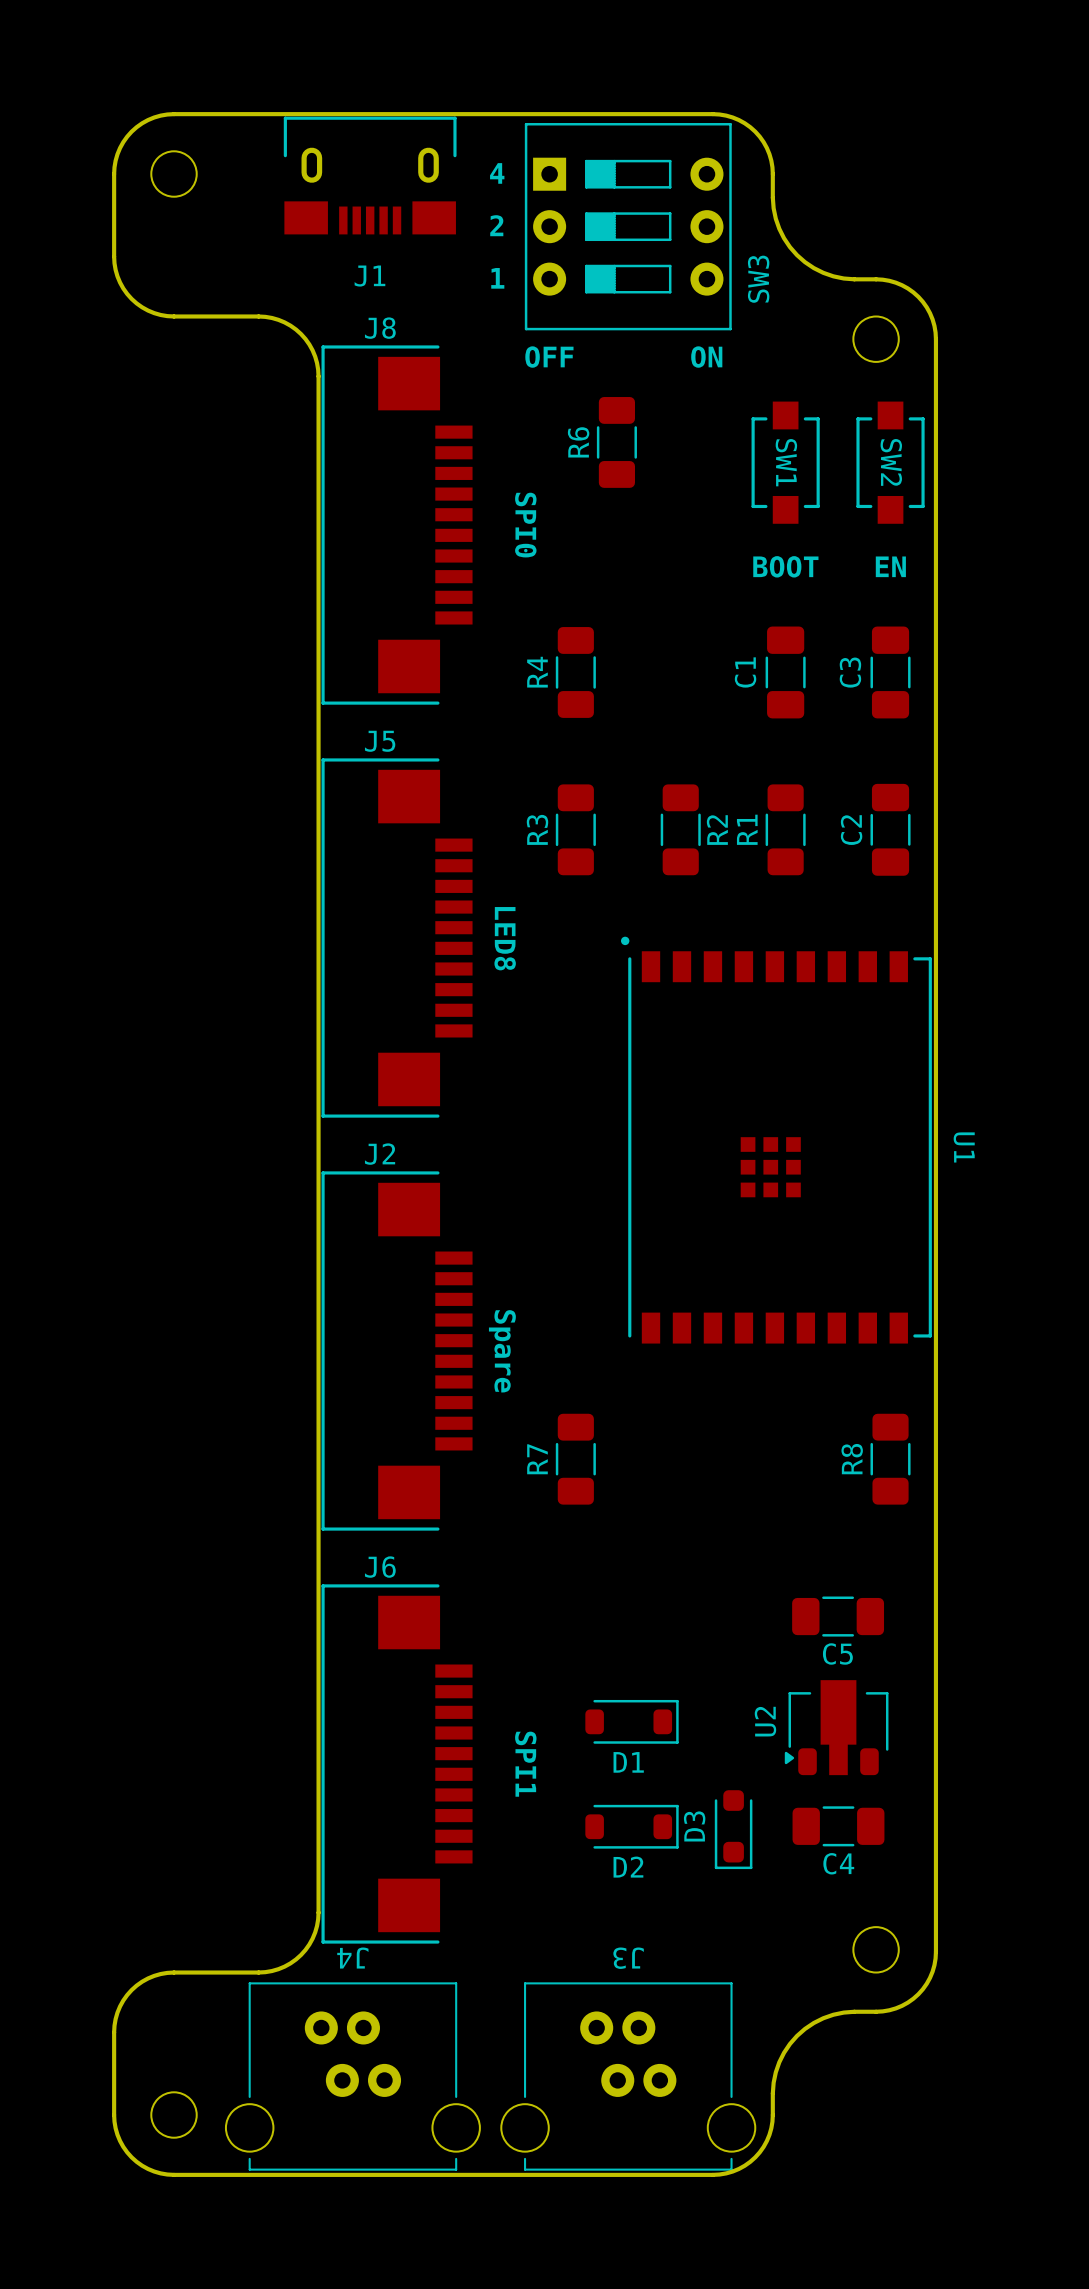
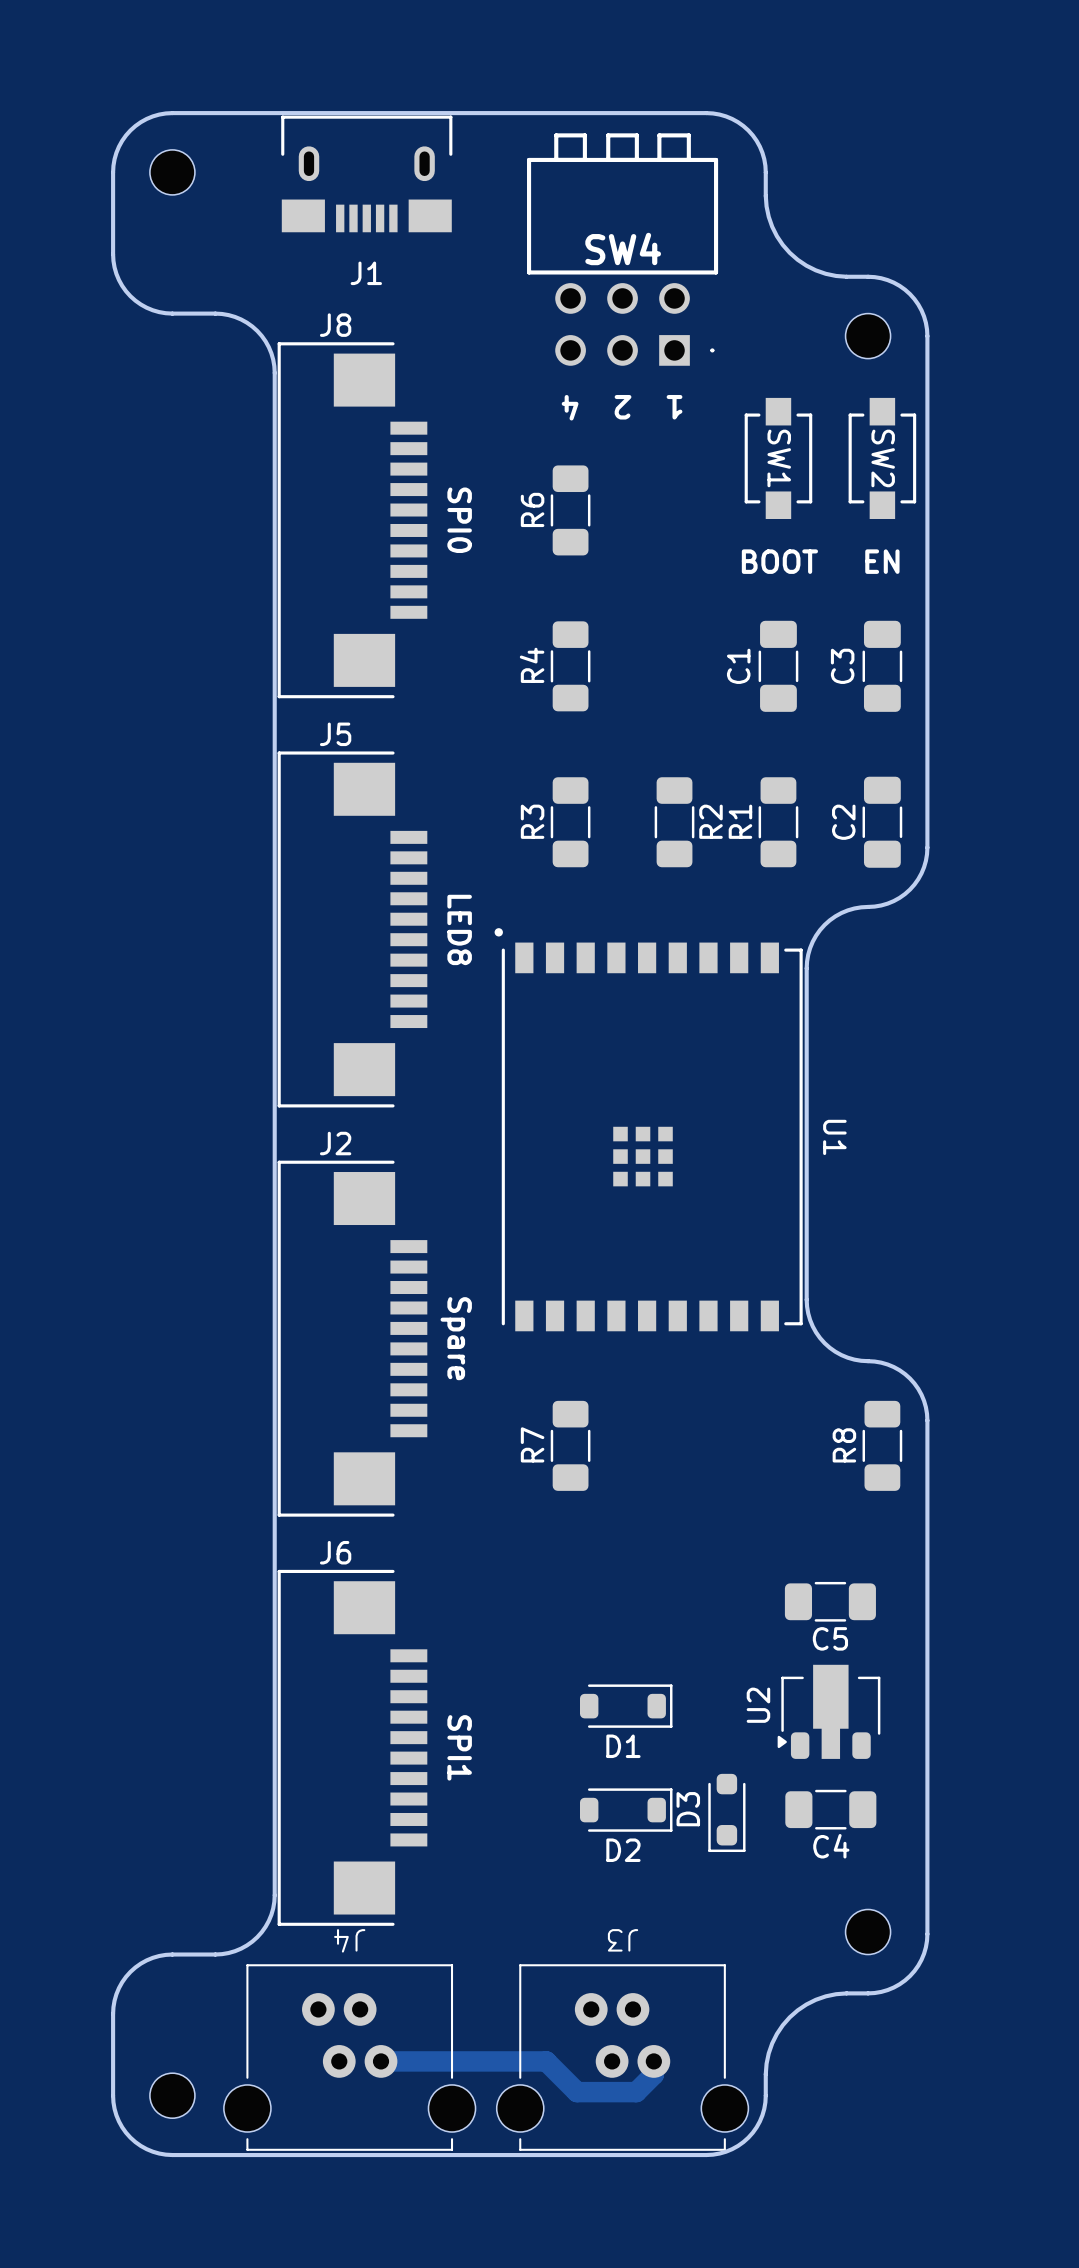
text rotation: 0° (497, 173) -> 180° (570, 407)
text position: 4 (497, 173) -> 4 (570, 407)
text rotation: 0° (496, 225) -> 180° (623, 407)
text position: 2 (496, 225) -> 2 (623, 407)
SW3: (628, 226) -> none
SW4: none -> (622, 249)
text rotation: 0° (497, 278) -> 180° (674, 407)
text position: 1 (497, 278) -> 1 (674, 407)
board edge: (217, 316) (265, 316) (278, 319) (290, 325) (305, 339) (312, 350) (317, 363) (318, 376) (318, 1919) (312, 1938) (305, 1949) (296, 1959) (284, 1966) (265, 1972) (217, 1972) -> (215, 313) (241, 319) (257, 330) (268, 347) (274, 372) (274, 1895) (271, 1914) (257, 1937) (241, 1948) (215, 1954)
text: OFF (549, 357) -> none
text: ON (706, 357) -> none
R6 position: (616, 442) -> (570, 510)
J8 position: (397, 525) -> (352, 520)
text position: SPI0 (525, 525) -> SPI0 (459, 520)
board edge: (935, 855) (935, 1433) -> (927, 847) (921, 873) (905, 894) (881, 905) (847, 910) (835, 916) (824, 924) (816, 935) (810, 948) (806, 968) (808, 1313) (812, 1326) (820, 1338) (835, 1351) (854, 1359) (887, 1364) (910, 1378) (921, 1394) (927, 1420)
J5 position: (397, 938) -> (352, 929)
text position: LED8 (505, 938) -> LED8 (459, 929)
U1 position: (776, 1140) -> (648, 1129)
J2 position: (397, 1351) -> (352, 1338)
text position: Spare (502, 1351) -> Spare (456, 1338)
J6 position: (397, 1763) -> (352, 1747)
text position: SPI1 (525, 1764) -> SPI1 (459, 1747)
track: none -> (381, 2061) (546, 2061) (577, 2092) (636, 2092) (653, 2074) (653, 2061)

